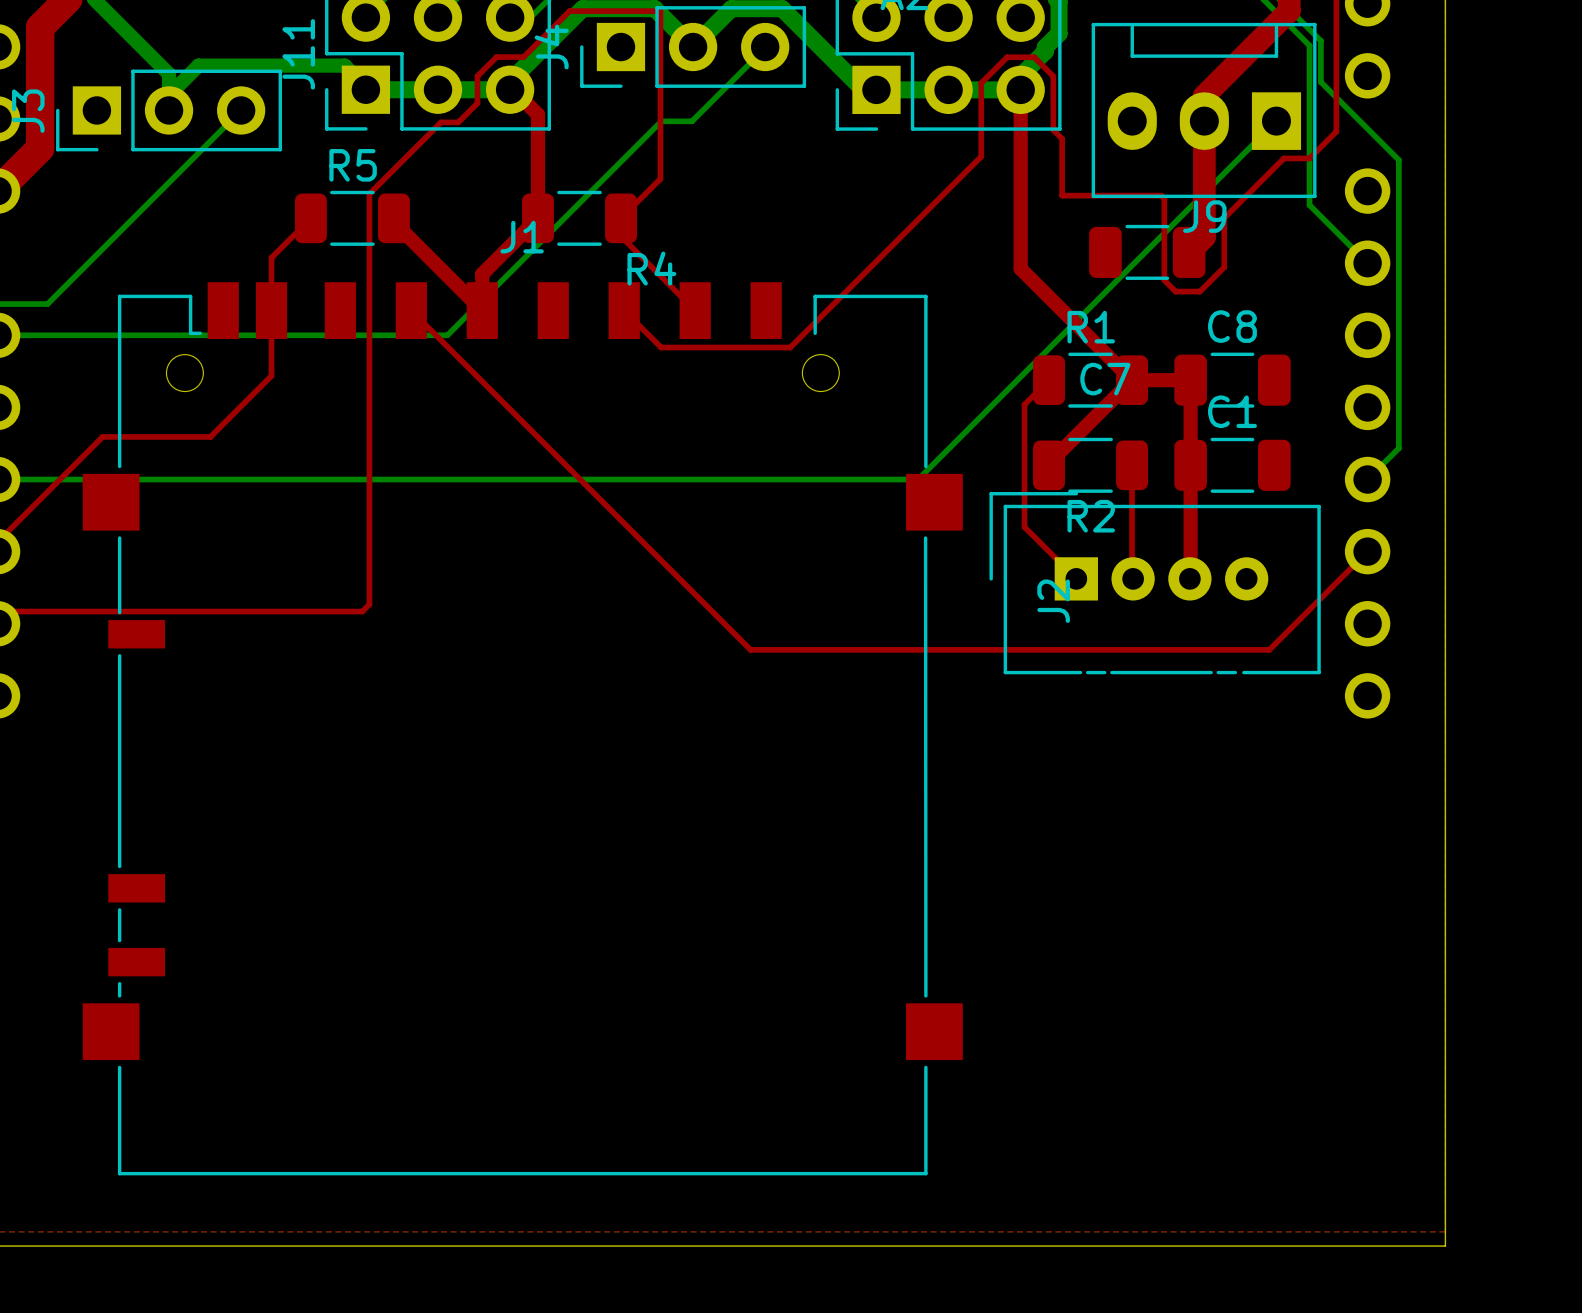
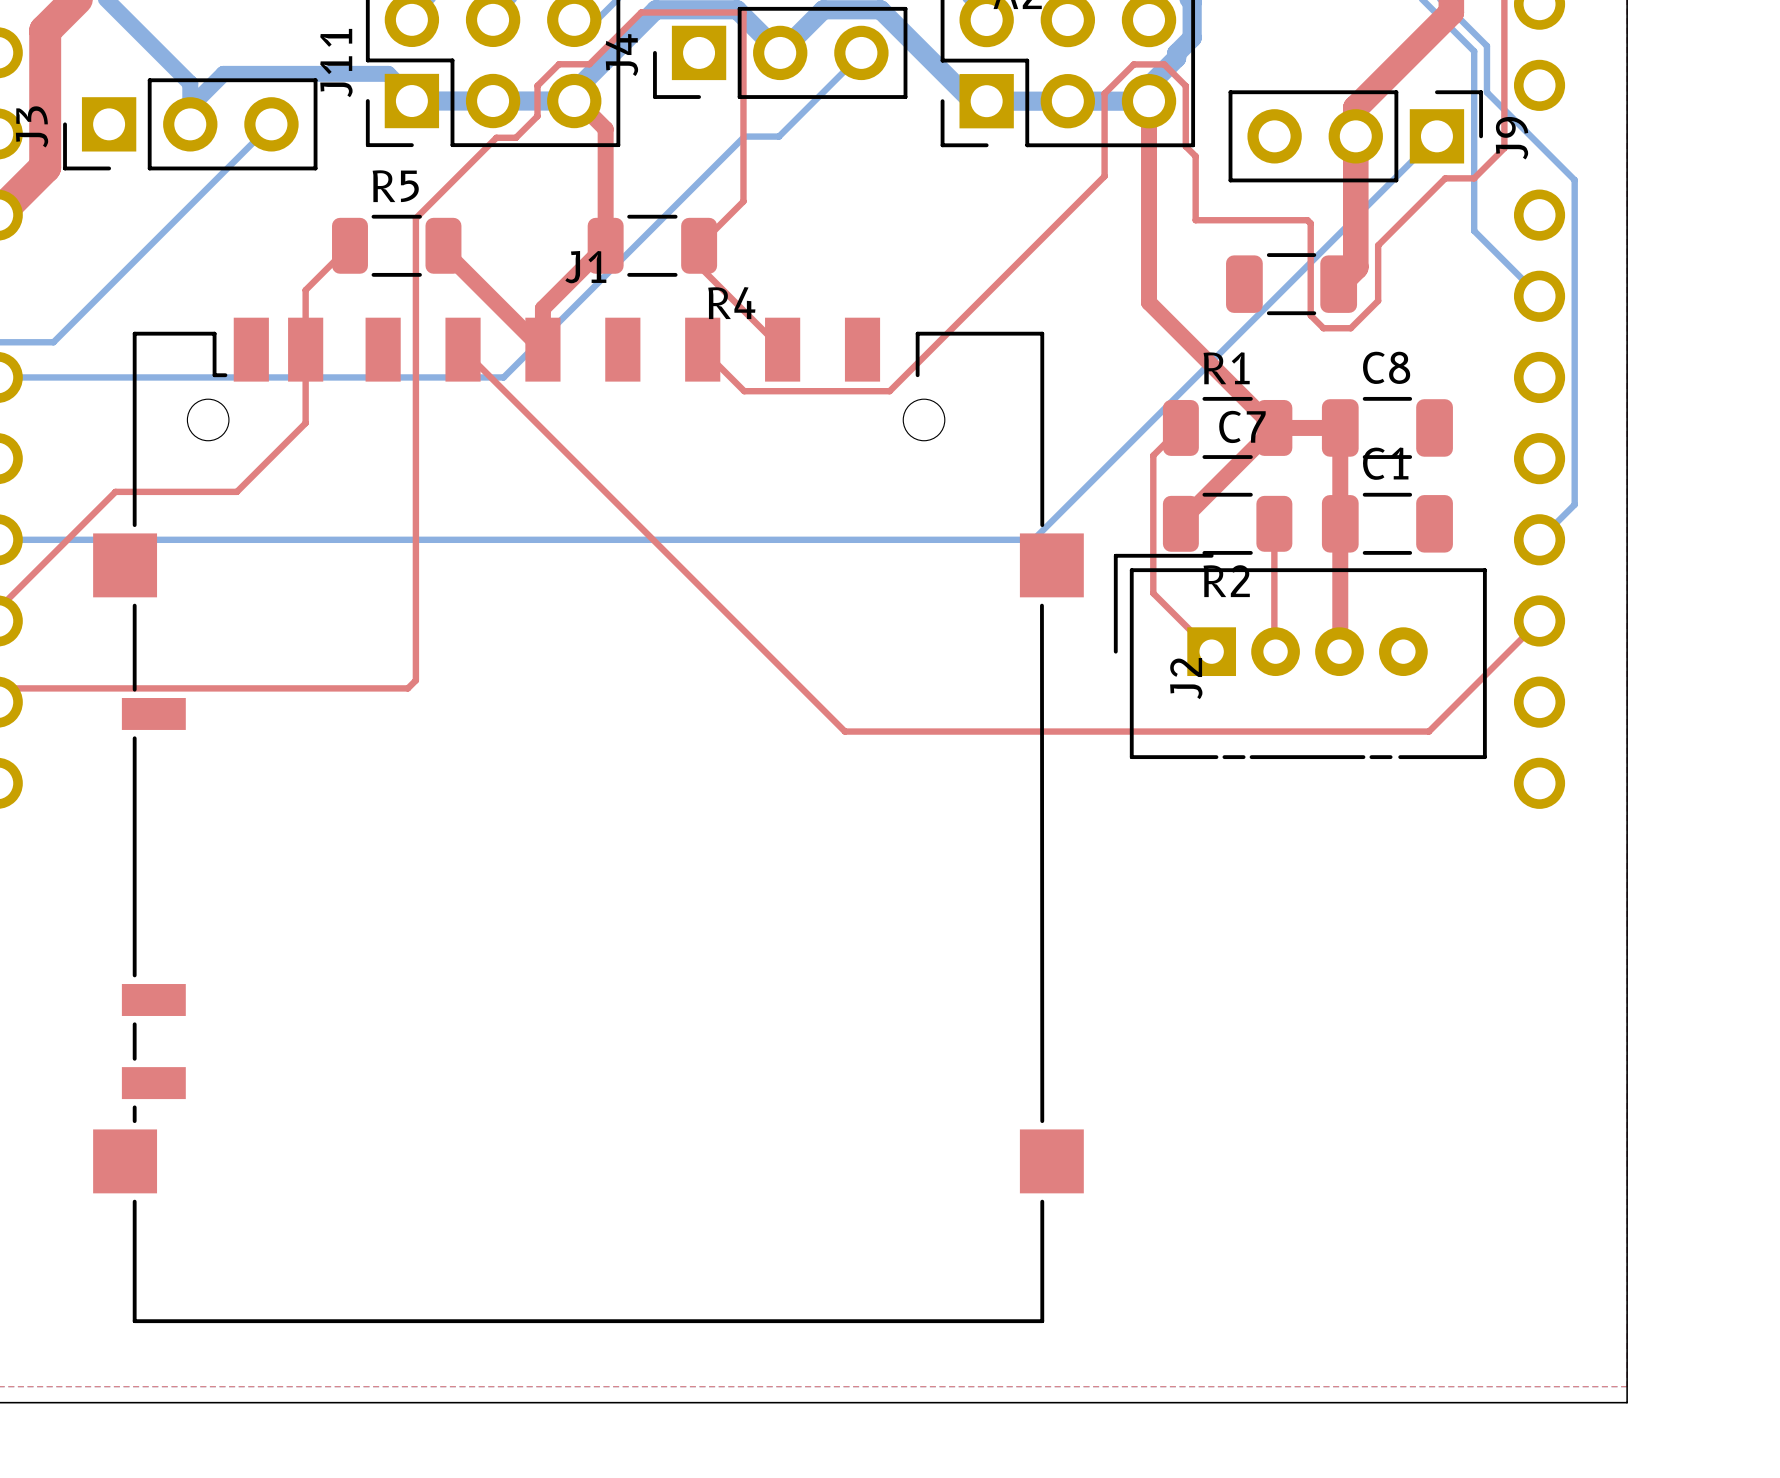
J9 footprint: [1091, 22, 1317, 199] -> [1228, 90, 1483, 183]
J9 name position: J9 (1204, 216) -> J9 (1511, 138)

